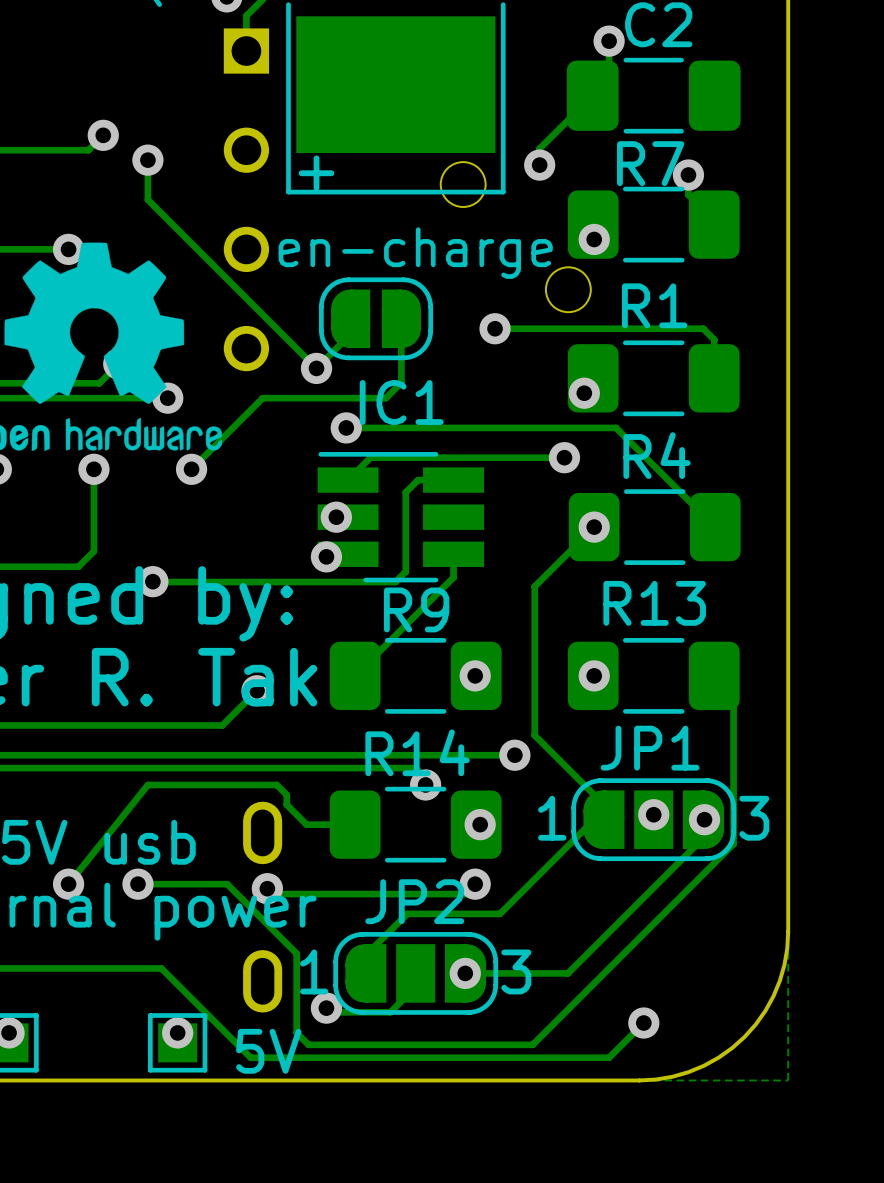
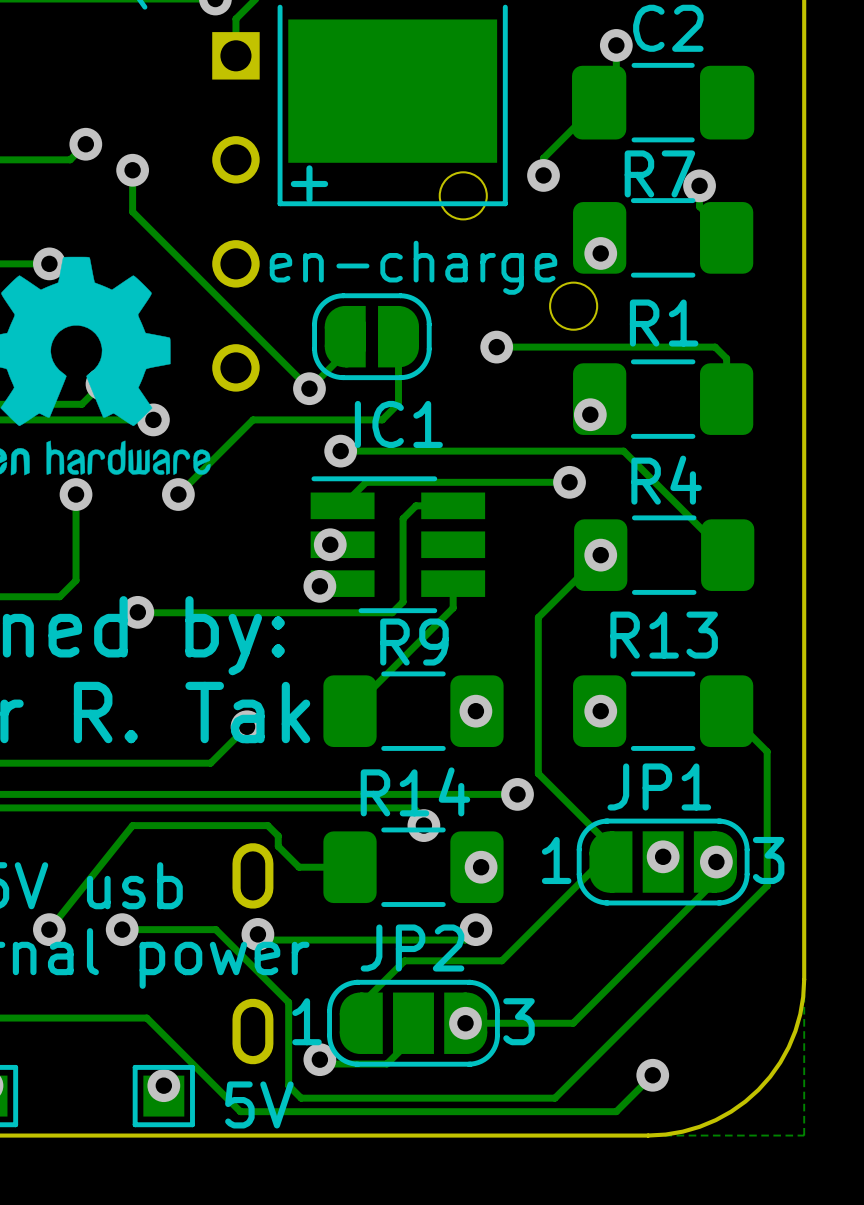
track: (733, 695) (733, 843) (532, 1044) -> (746, 731) (767, 751) (767, 885) (554, 1098) (536, 1098)

